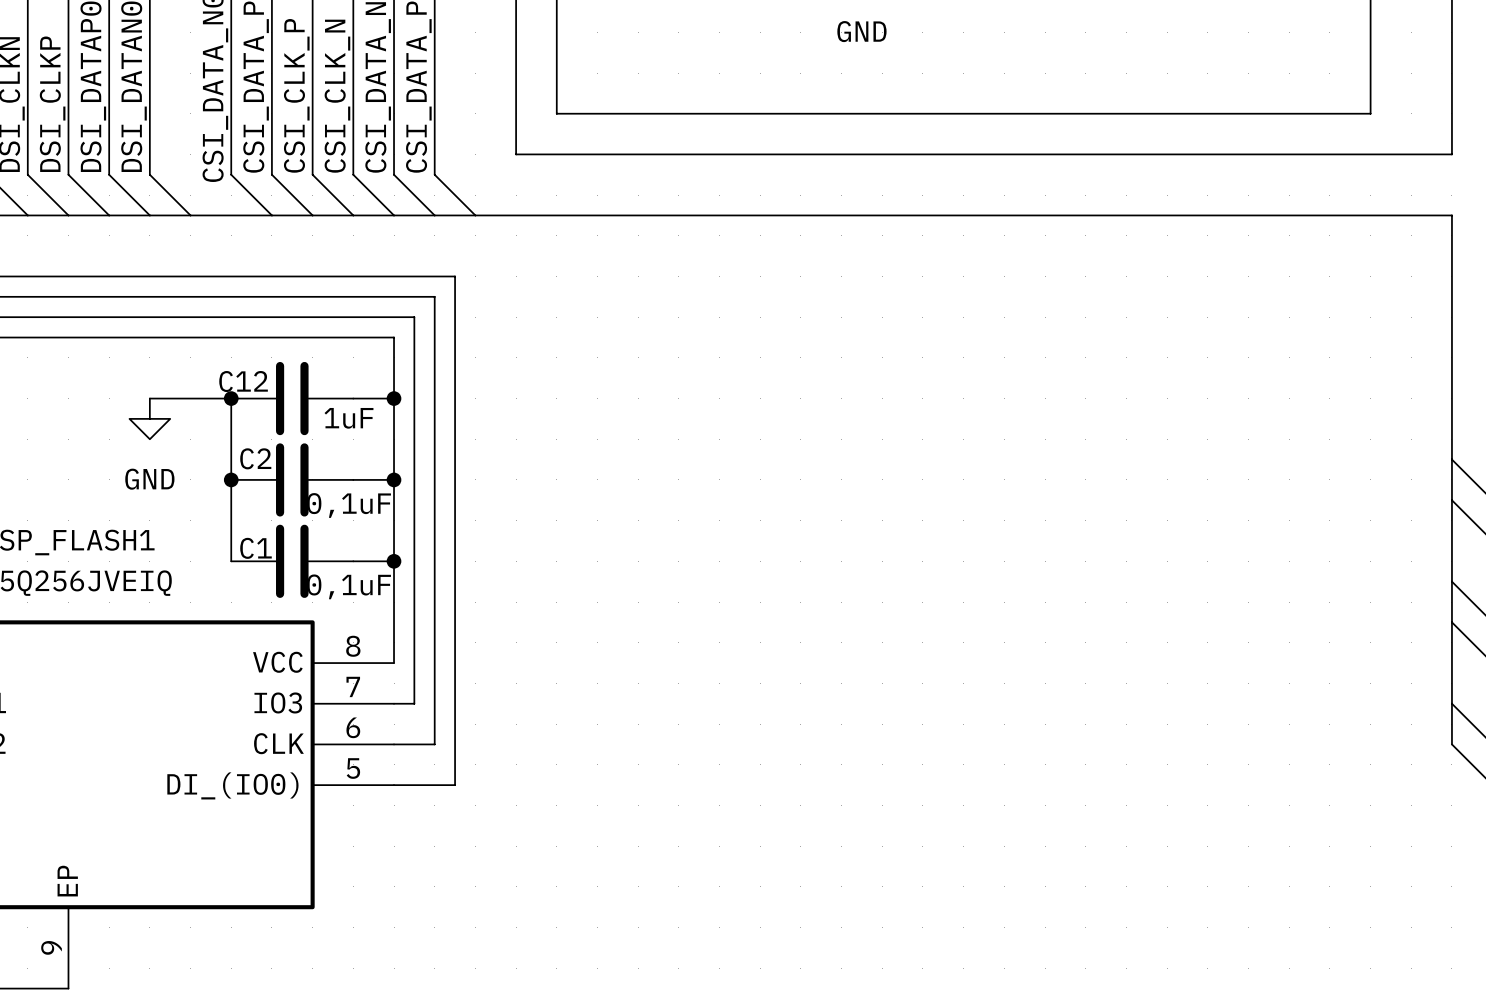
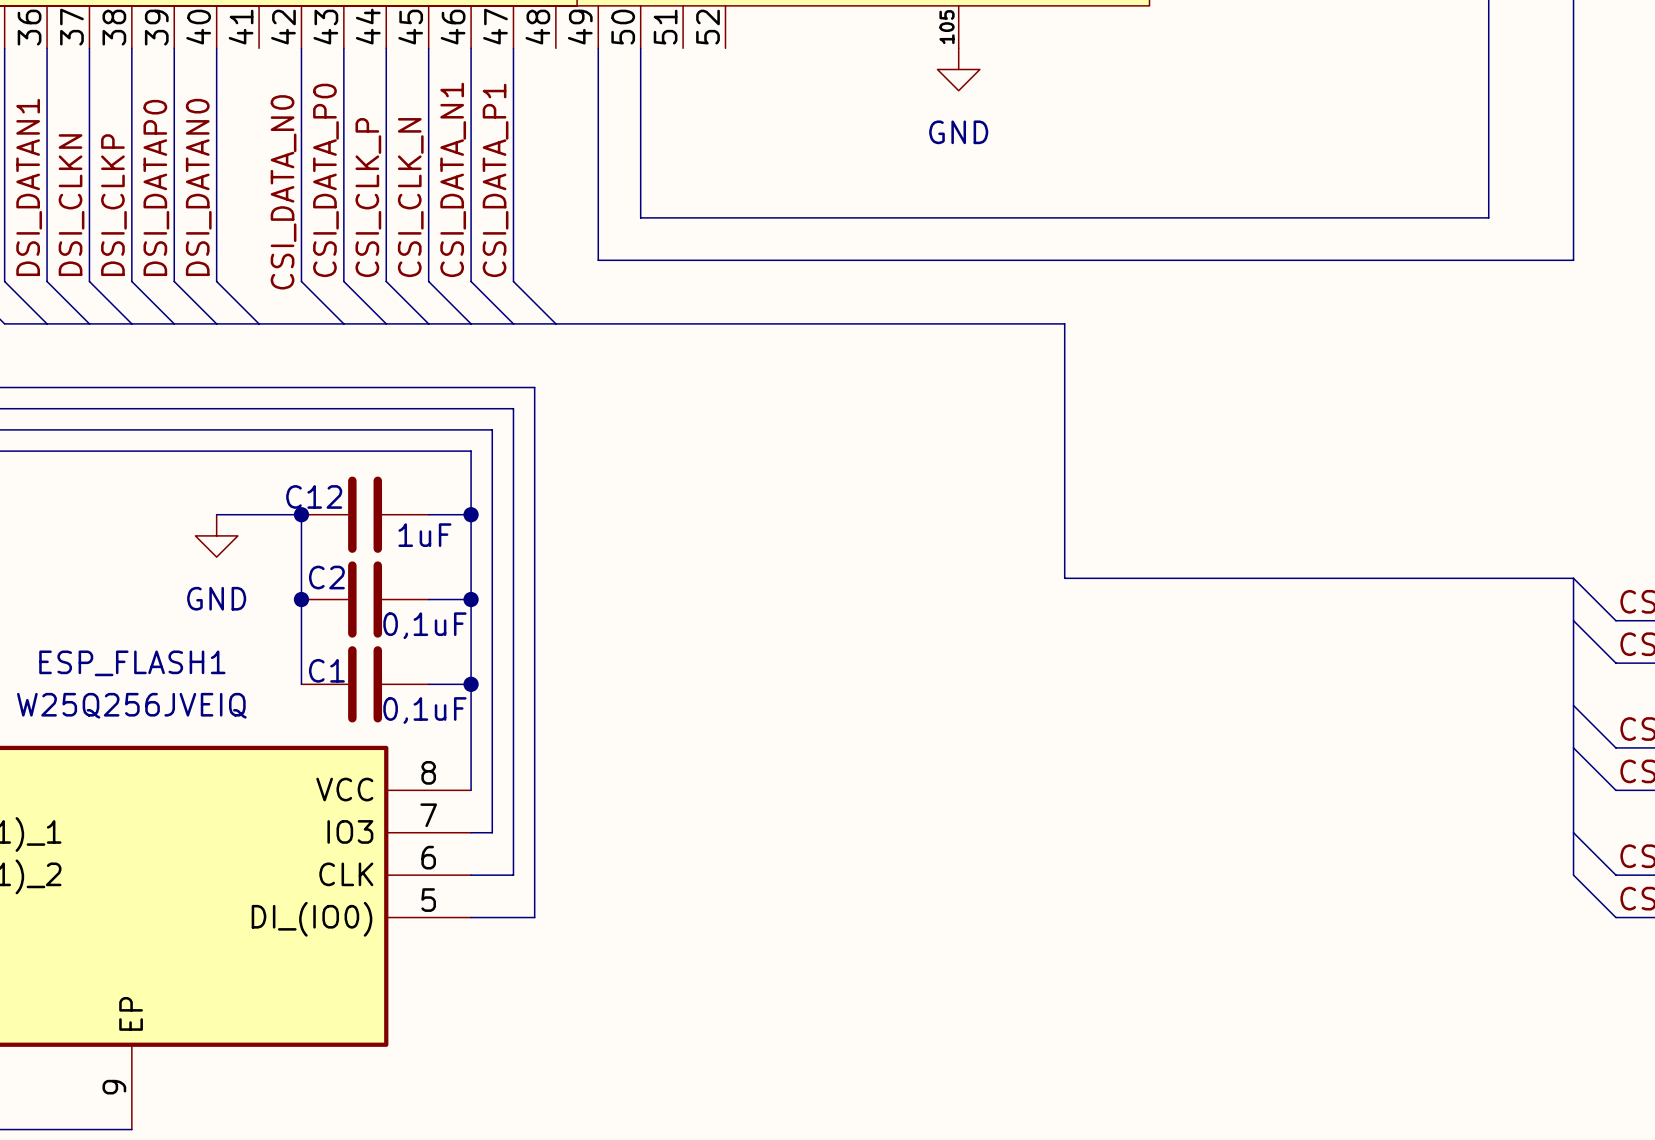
bus: (963, 215) (1451, 215) (1451, 459) -> (1064, 323) (1064, 578) (1573, 578)

